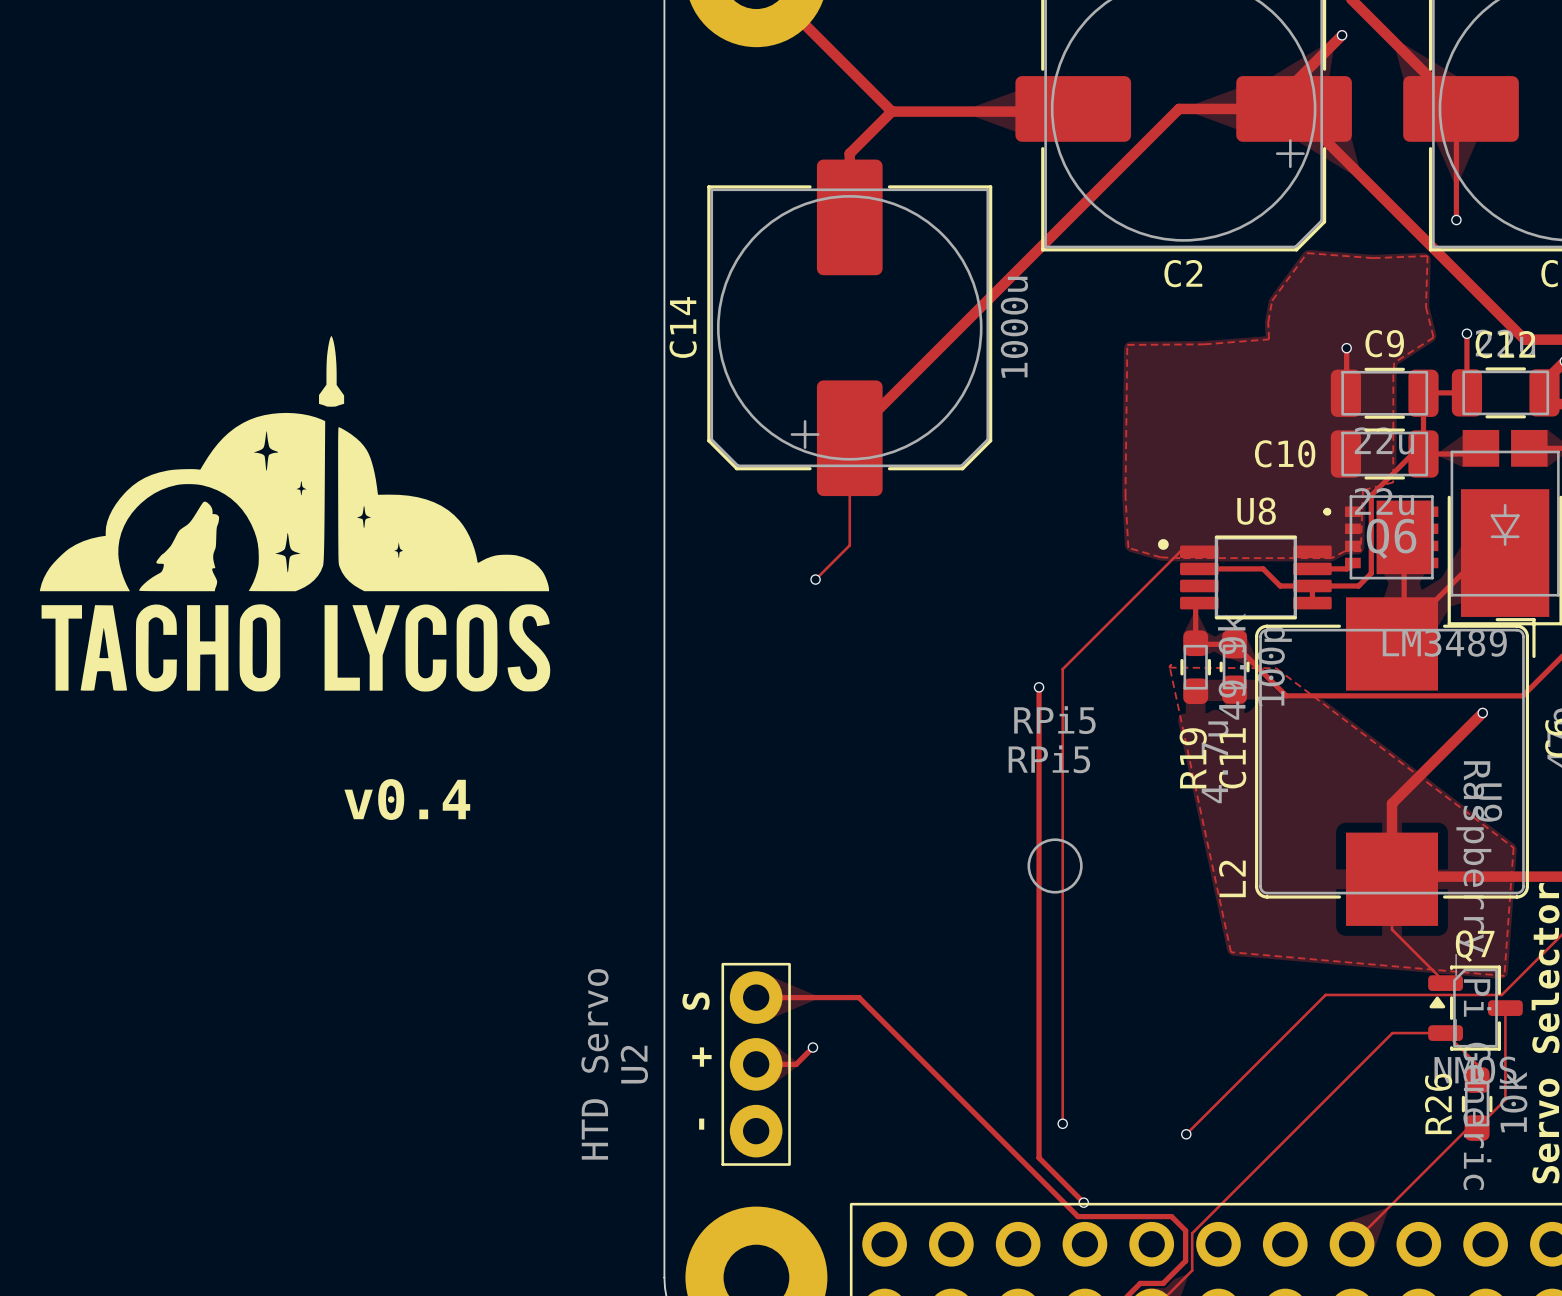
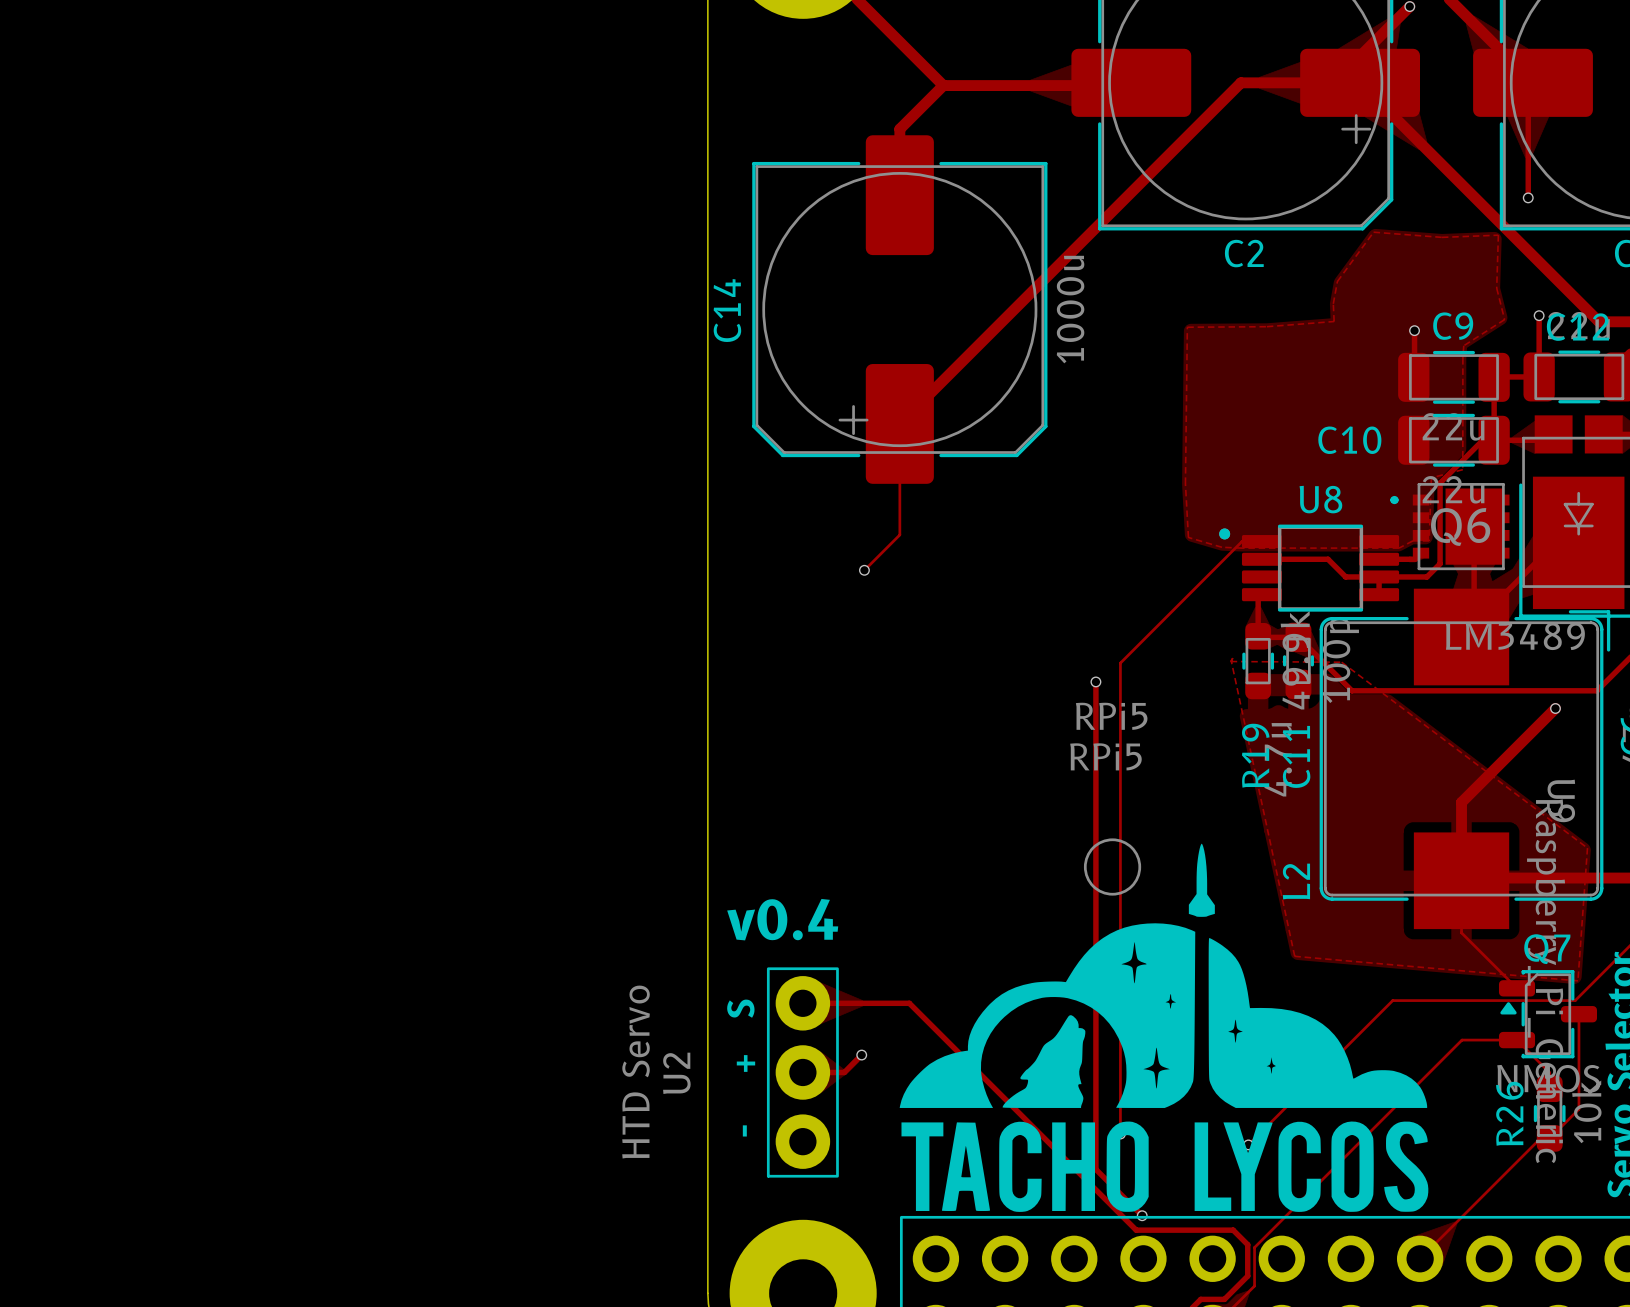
drawing: [39, 336, 551, 692] -> none
text position: v0.4 (407, 799) -> v0.4 (782, 919)
drawing: none -> [899, 843, 1429, 1212]

